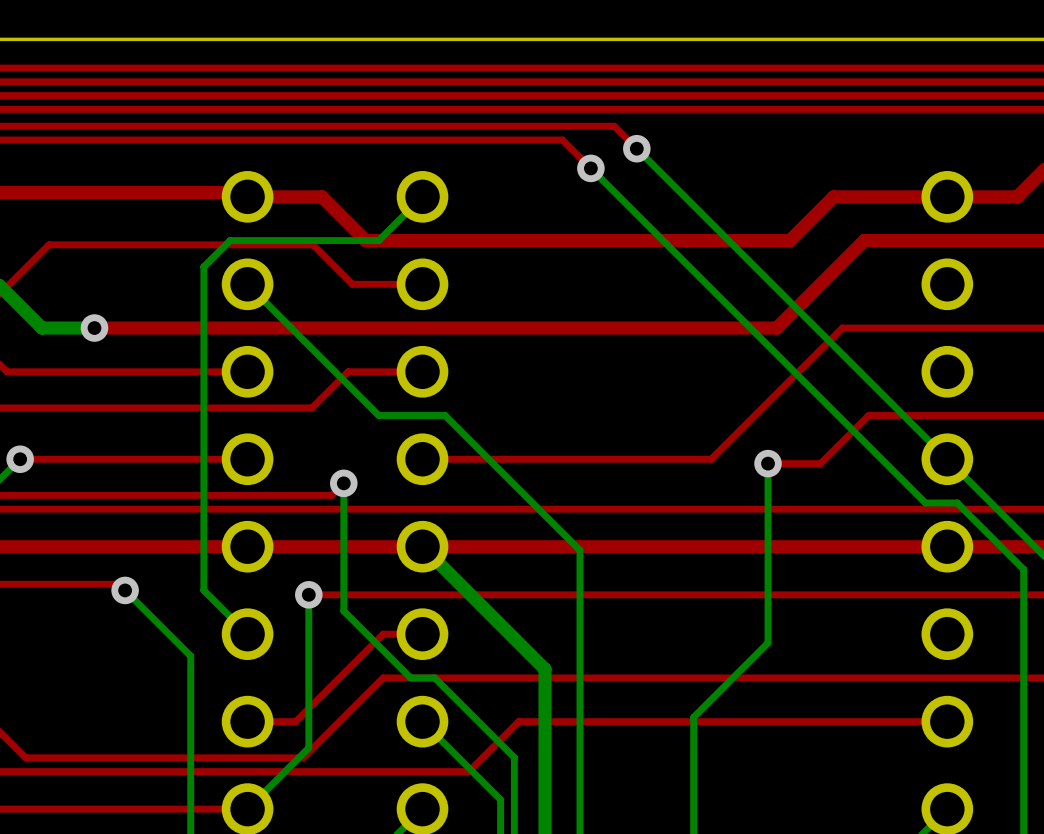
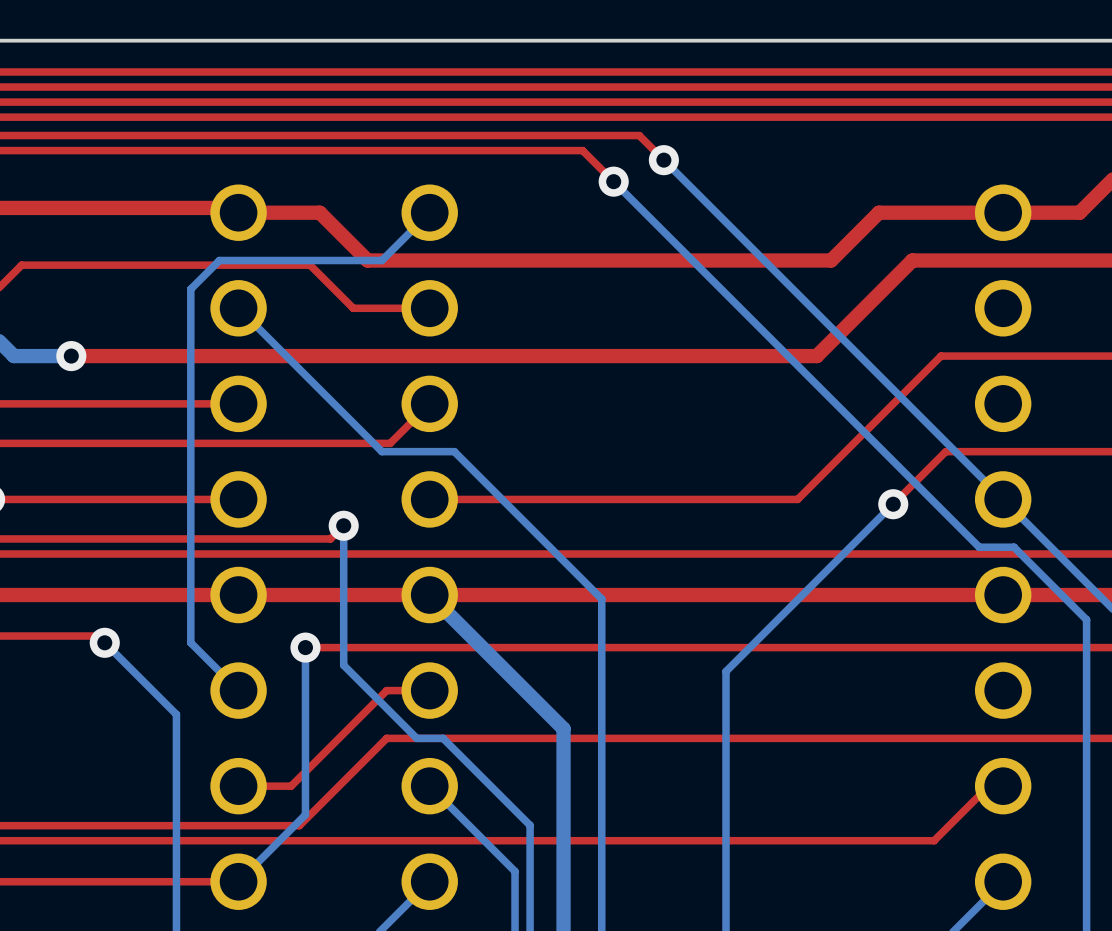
top track: (890, 328) (842, 328) (711, 459) -> (941, 356) (797, 499) (745, 499)
top track: (422, 371) (348, 371) (312, 407) -> (429, 403) (390, 443) (308, 443)
top track: (894, 415) (868, 415) (820, 463) (768, 463) -> (945, 451) (893, 504)
bottom track: (768, 463) (768, 642) (693, 717) -> (893, 504) (726, 671) (726, 781)
via position: (768, 463) -> (893, 504)
top track: (934, 721) (518, 721) (468, 771) -> (988, 786) (934, 840) (480, 840)

